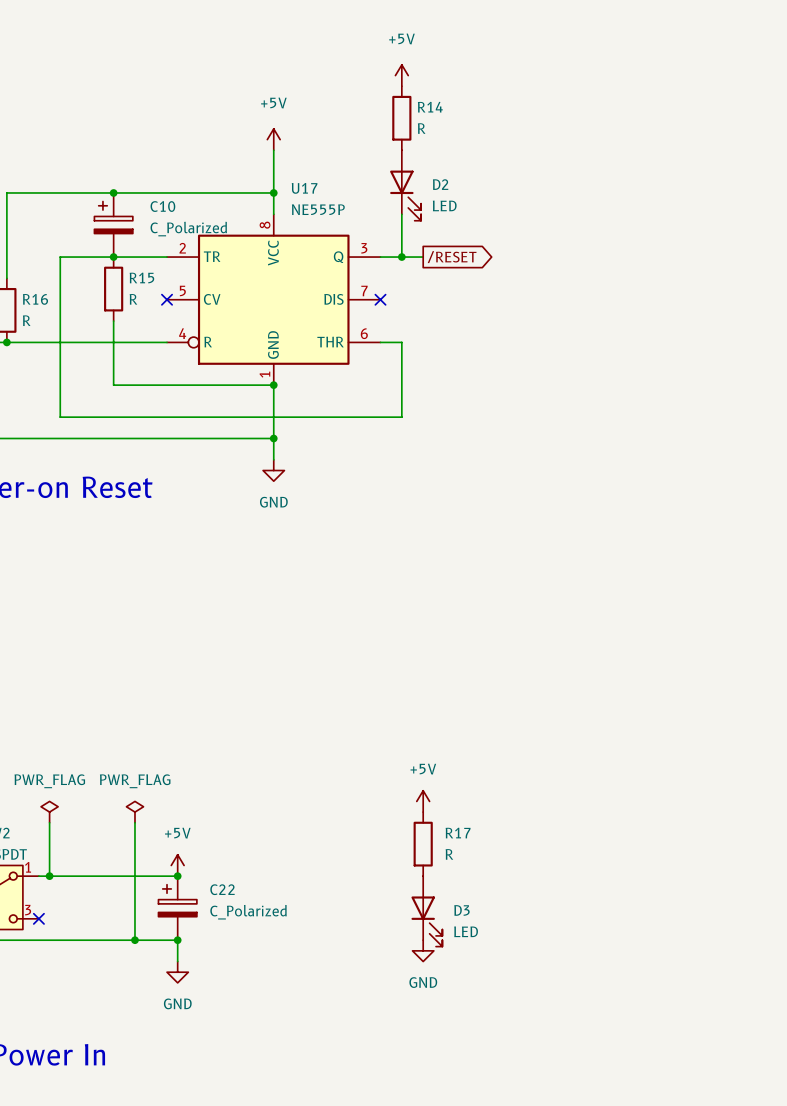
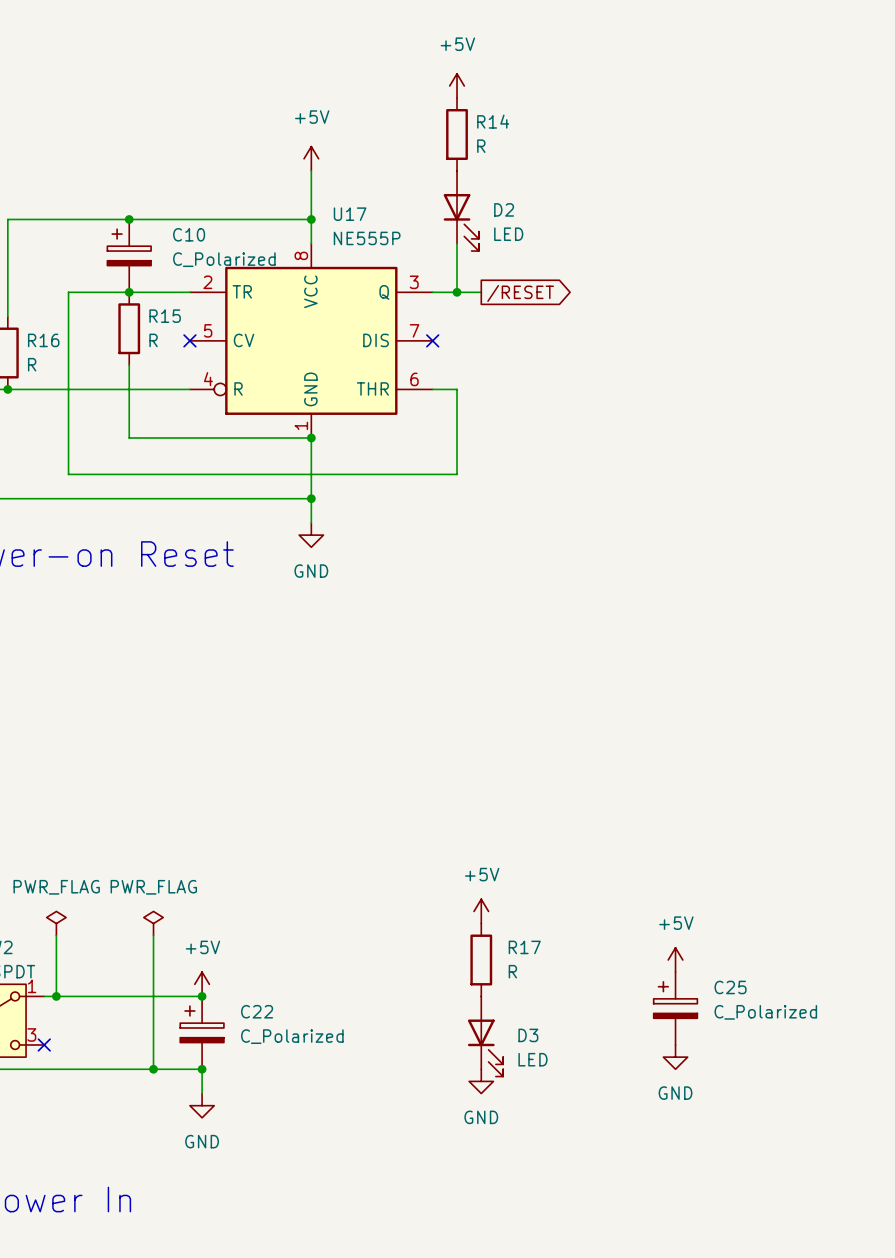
power symbol: none -> +5V (675, 960)
C25: none -> C_Polarized (675, 1008)
power symbol: none -> GND (675, 1057)

